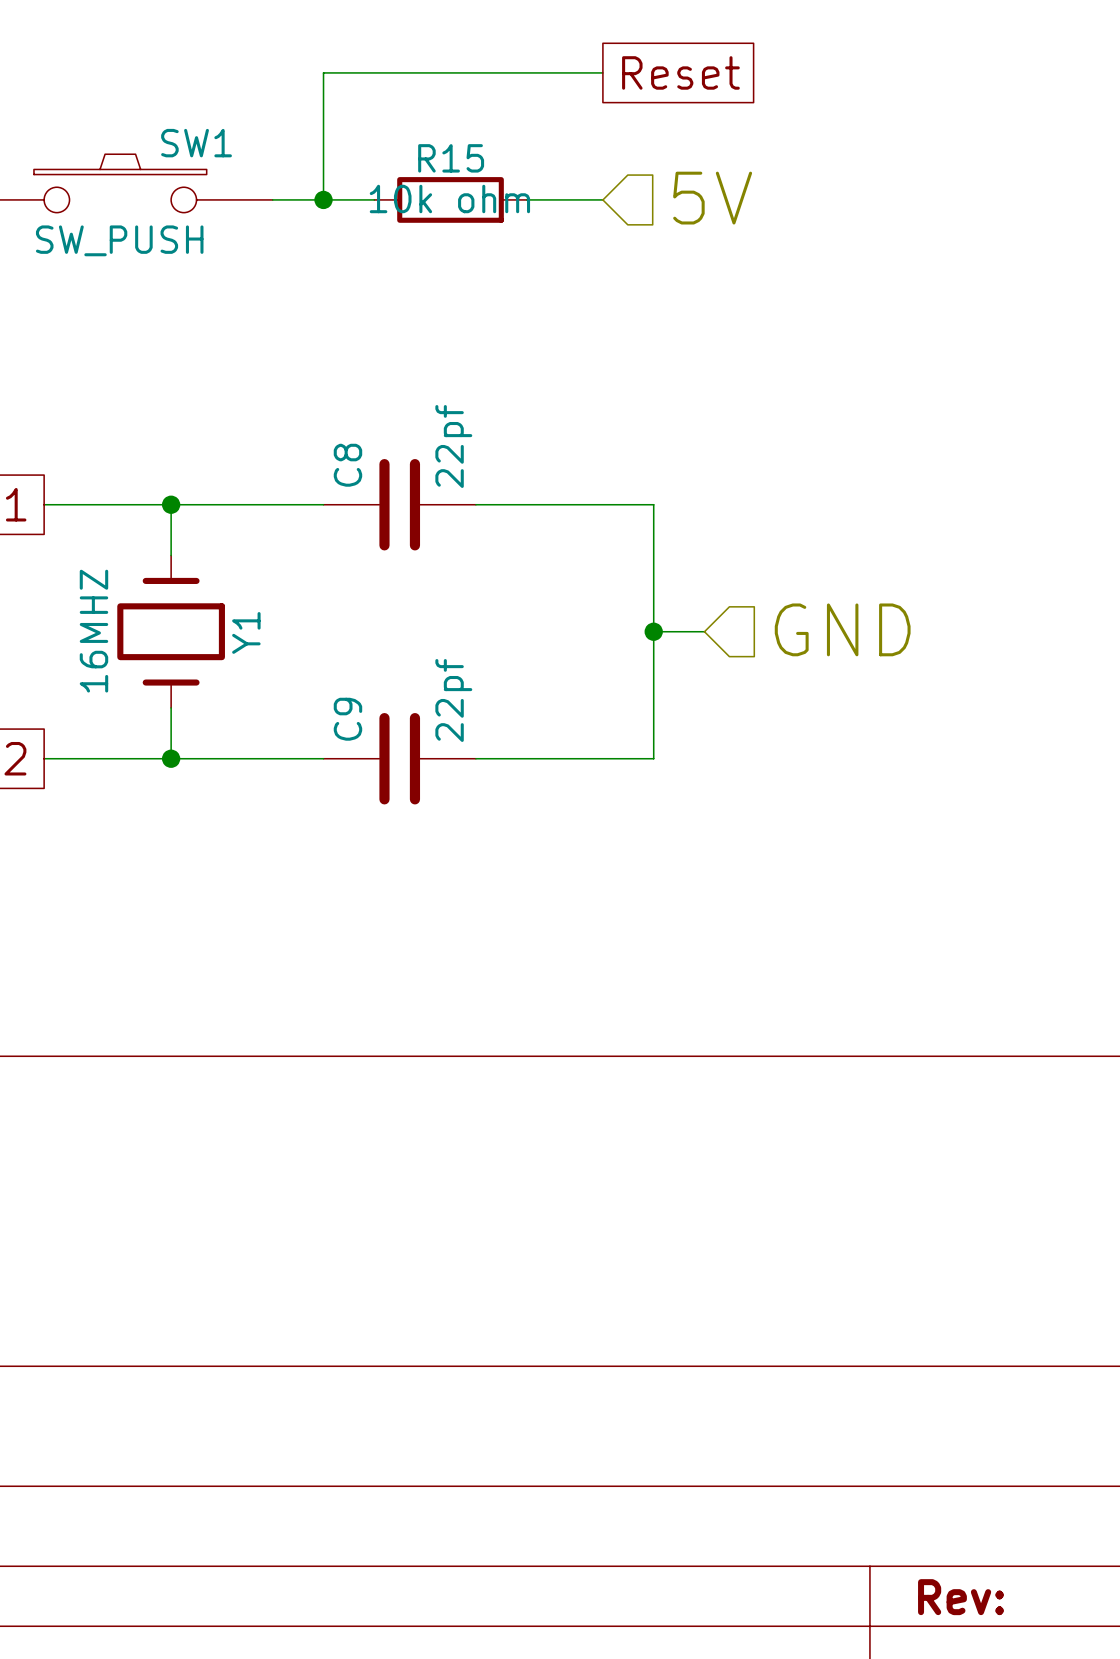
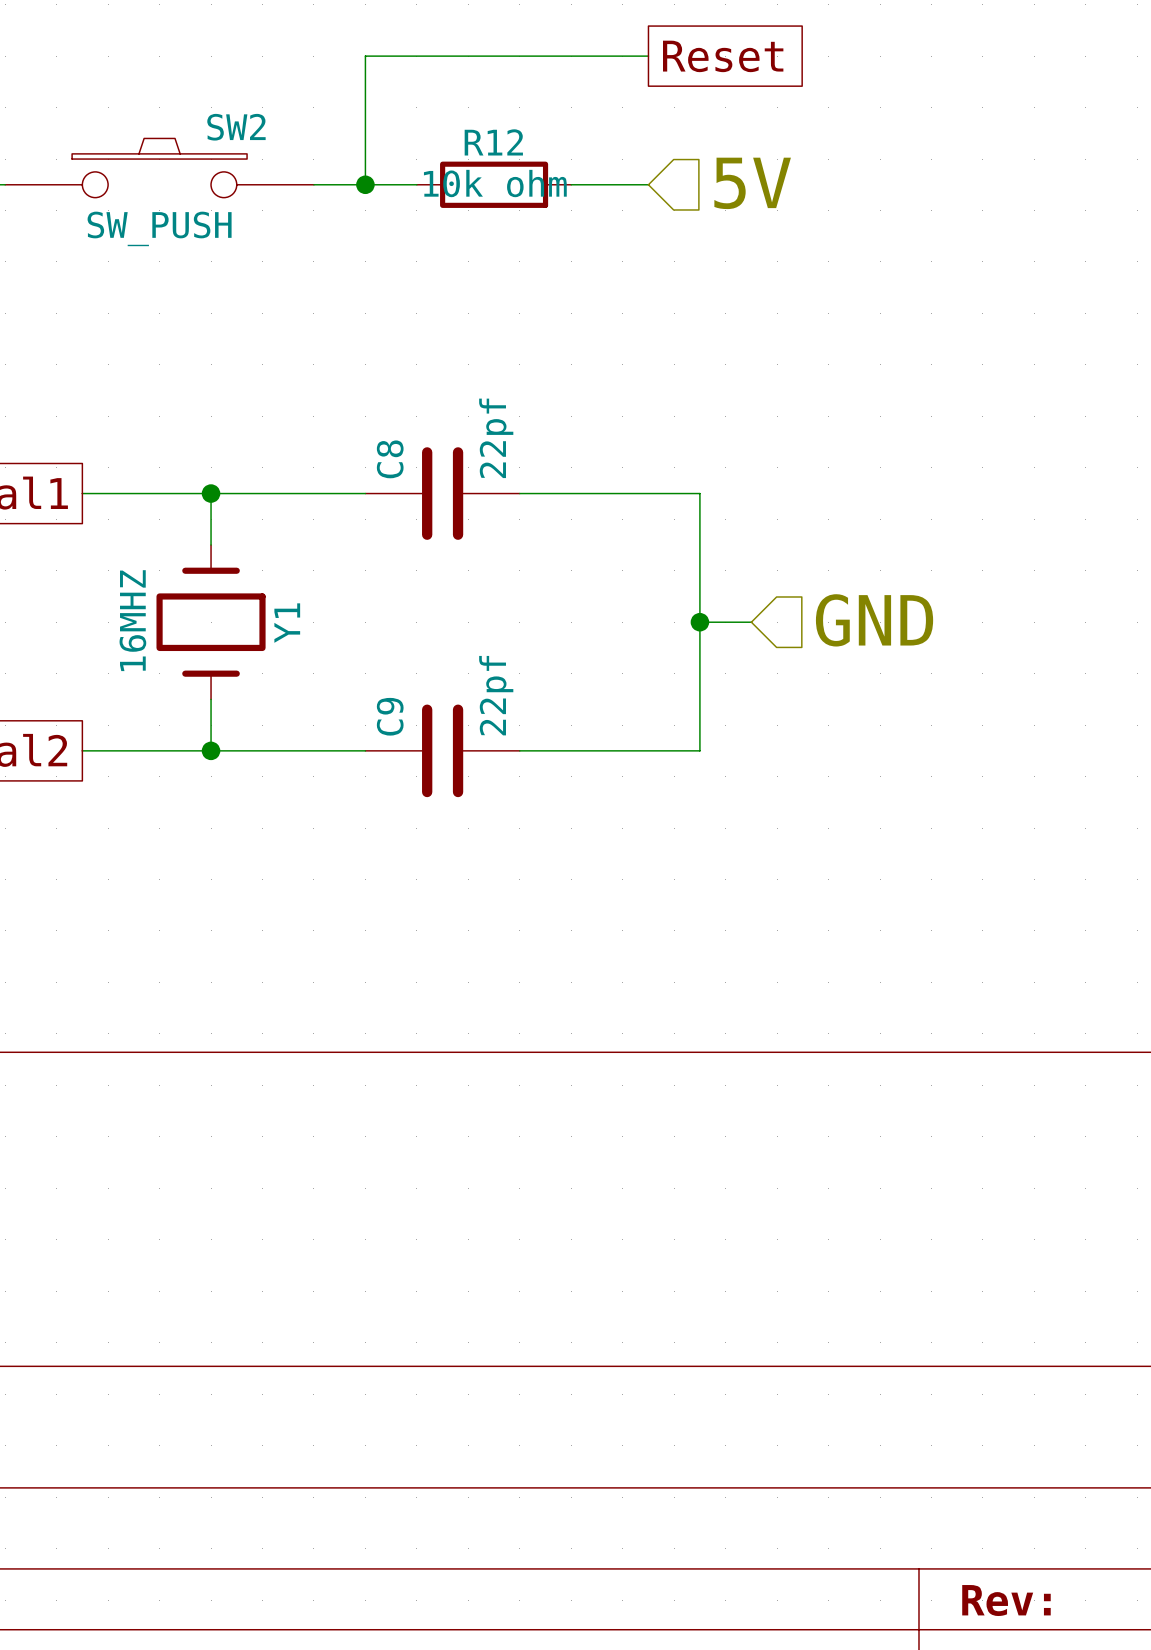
SW1 name: SW1 (196, 143) -> SW2 (236, 127)
R15 name: R15 (451, 158) -> R12 (493, 142)

